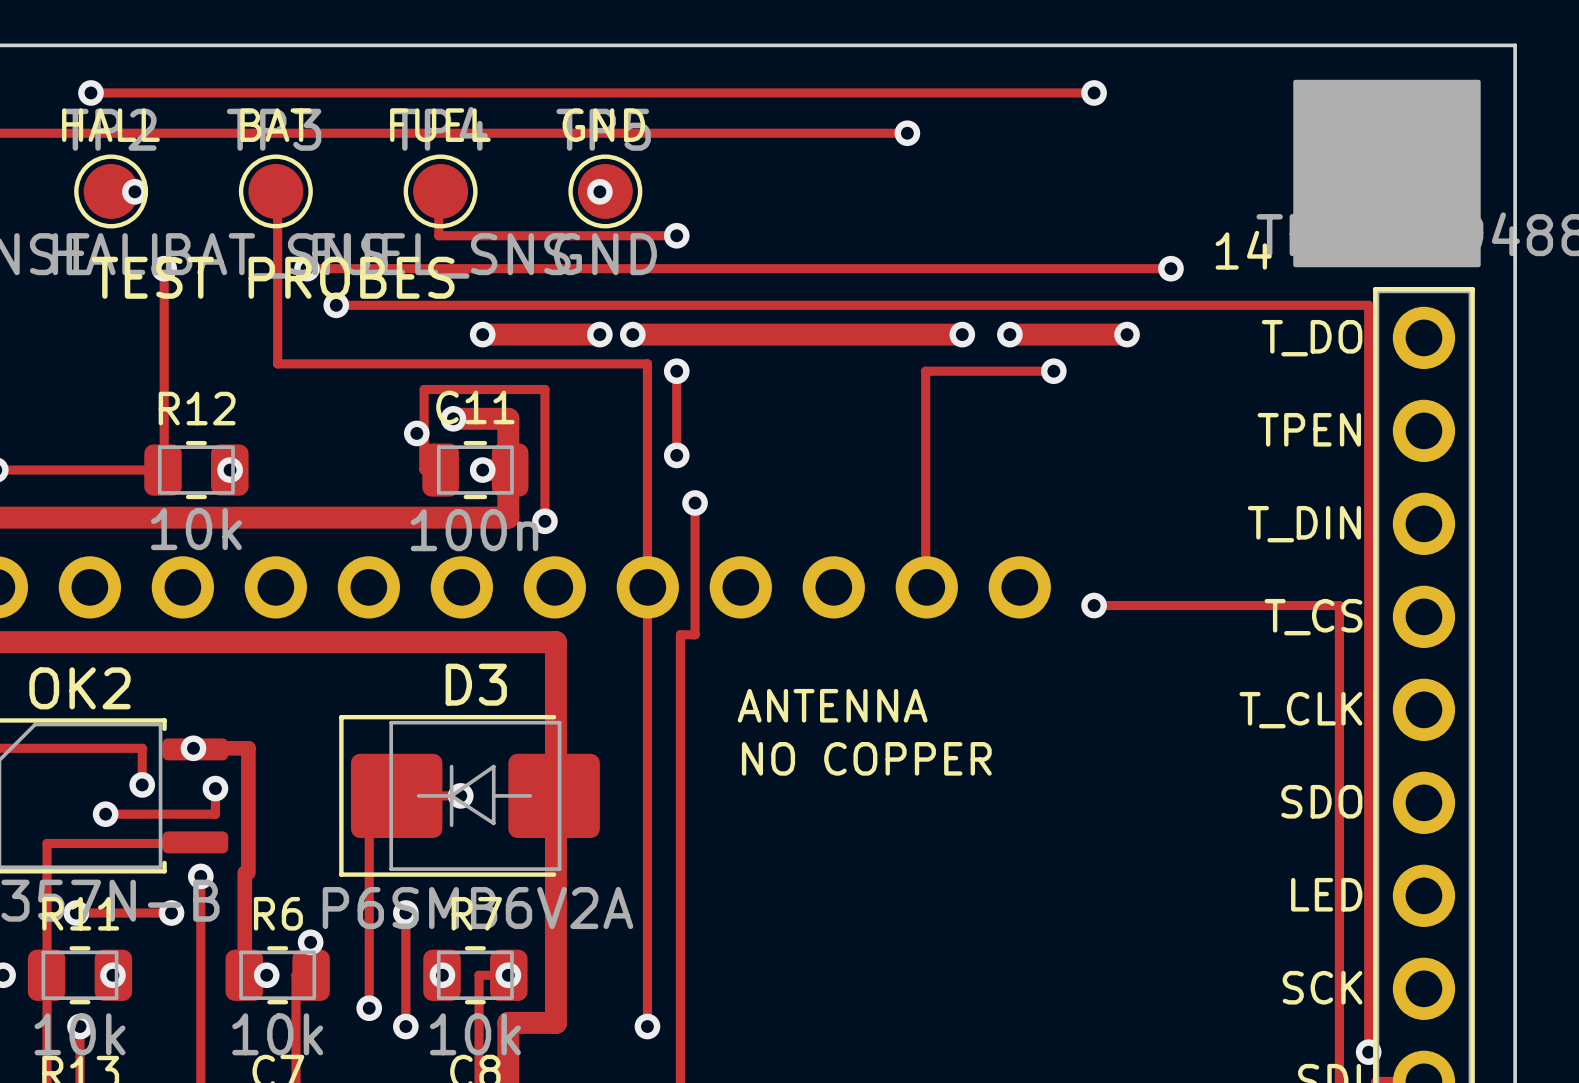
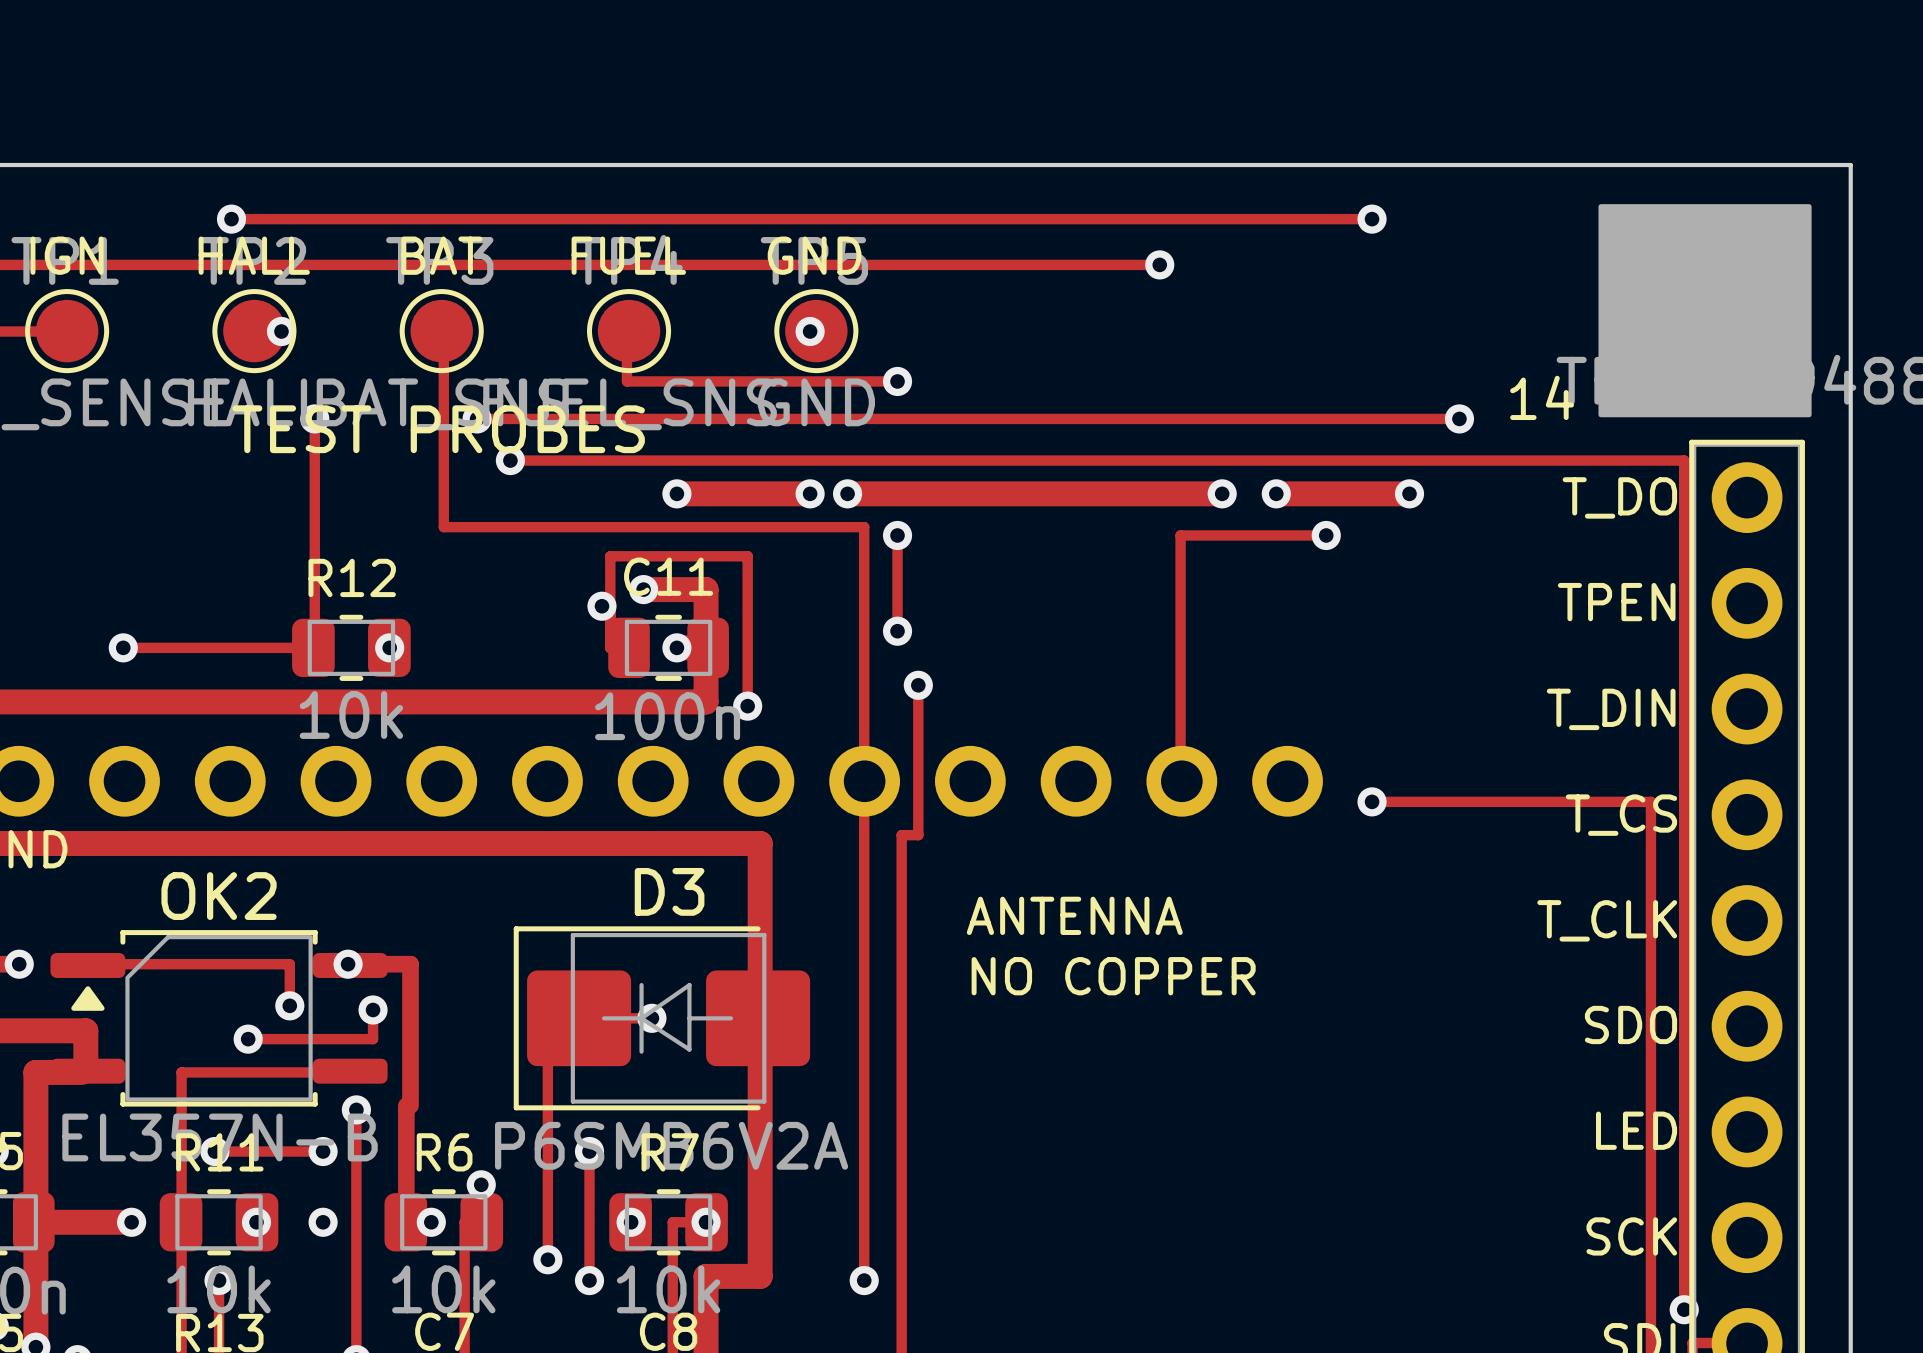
via: none -> (323, 1222)

